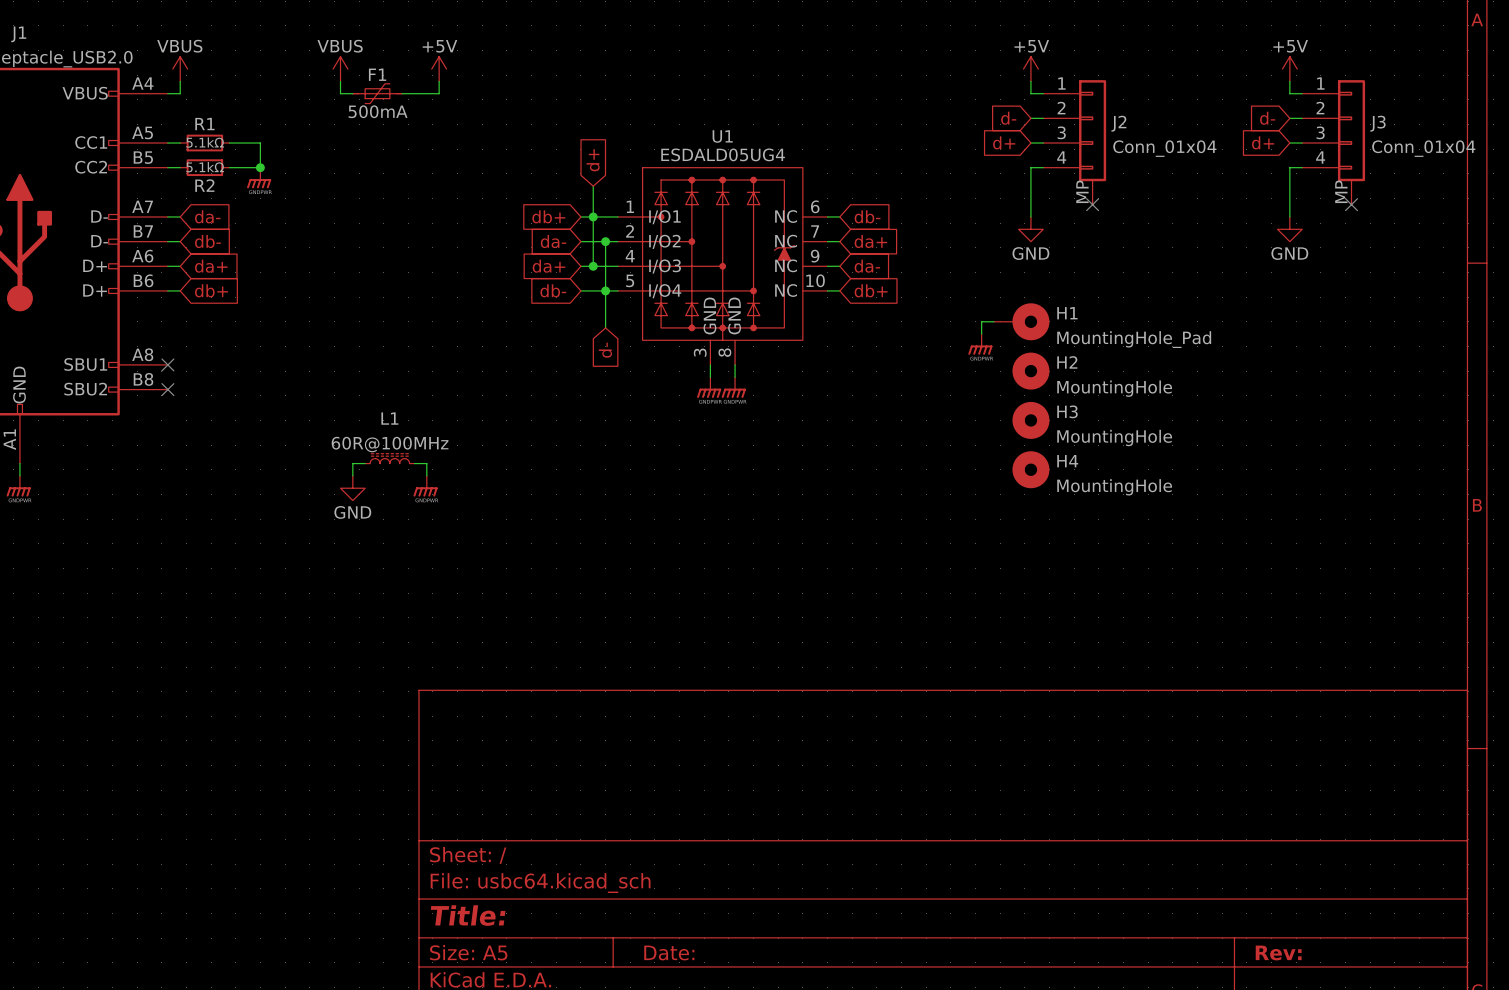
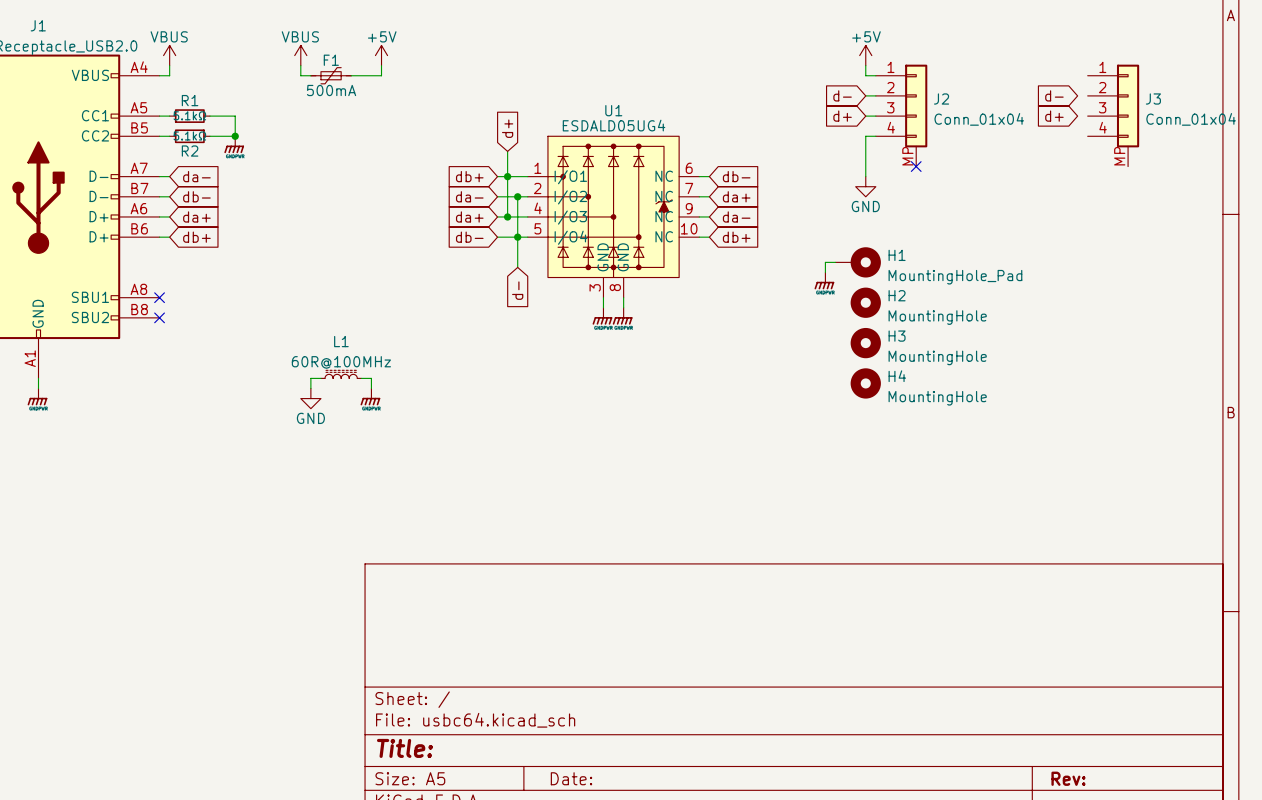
power symbol: +5V (1289, 69) -> none
wire: (1289, 81) (1289, 93) (1302, 93) -> none
wire: (1289, 118) (1302, 118) -> none
wire: (1289, 143) (1302, 143) -> none
wire: (1302, 167) (1289, 167) (1289, 216) -> none
no-connect mark: (1351, 204) -> none
power symbol: GND (1289, 229) -> none

